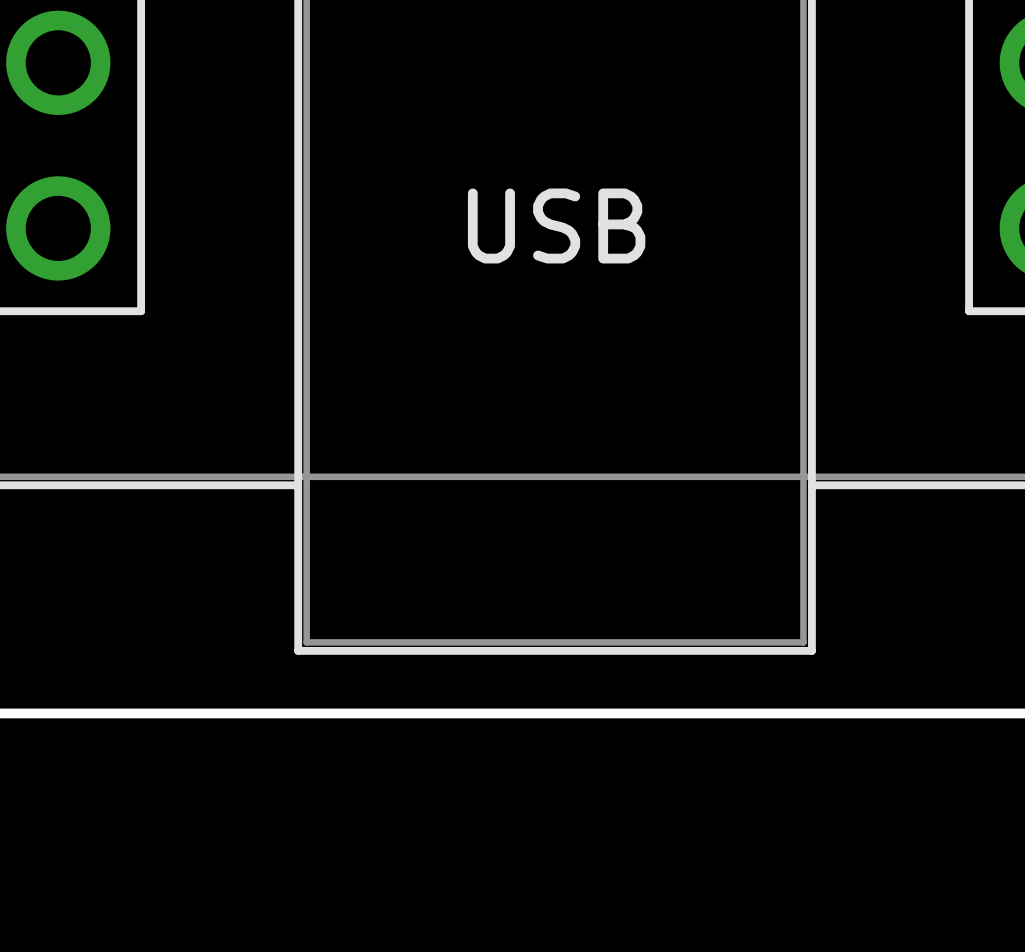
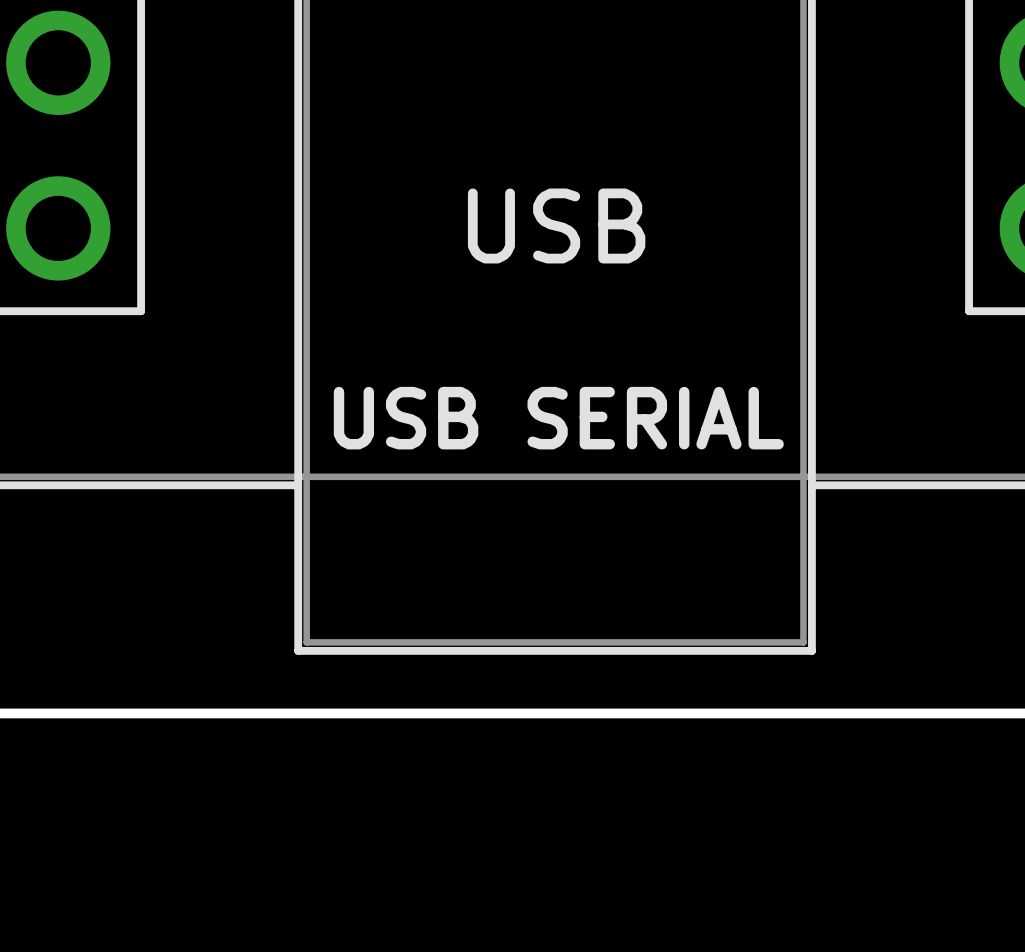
text: none -> USB SERIAL (558, 418)

